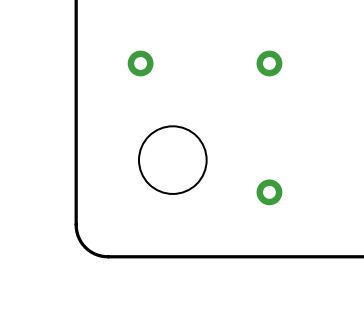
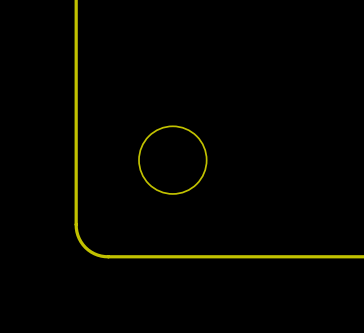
via: (140, 63) -> none
via: (269, 63) -> none
via: (269, 192) -> none

